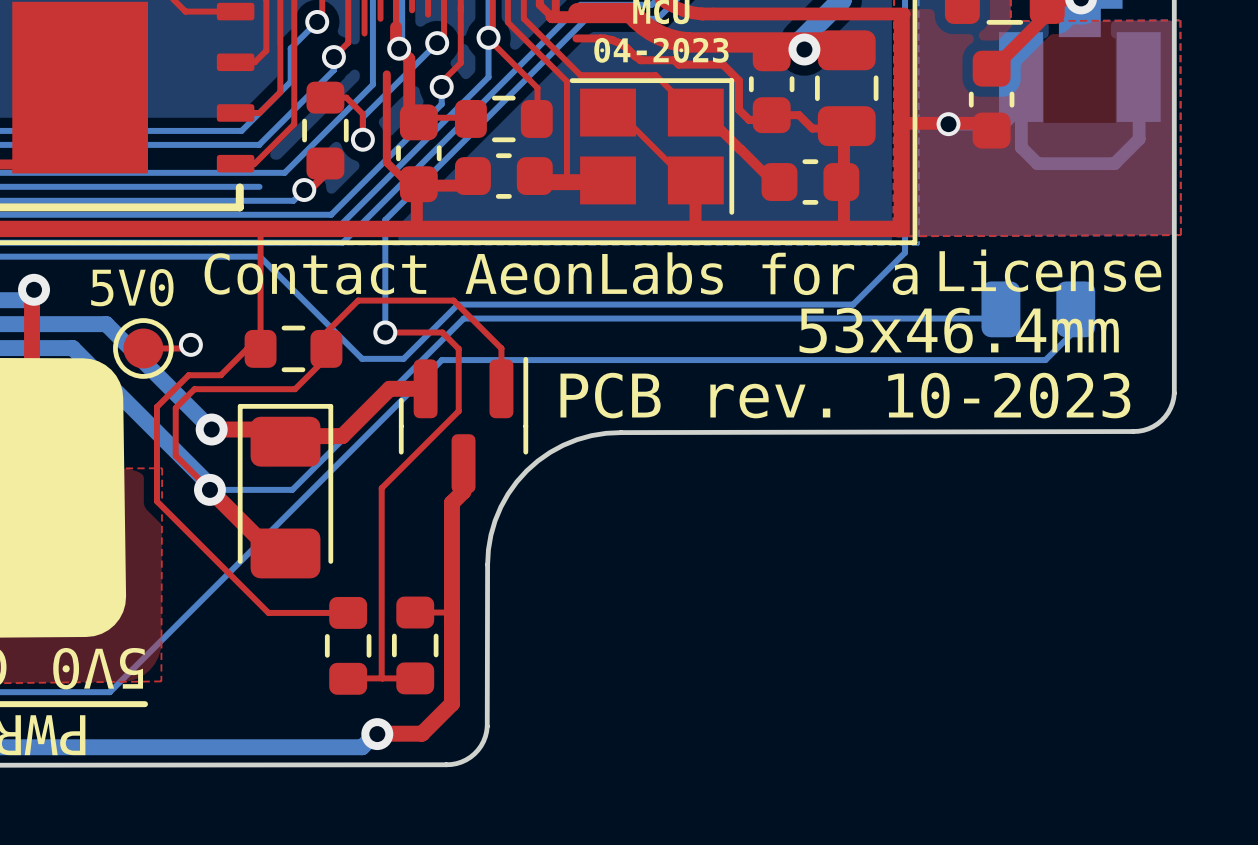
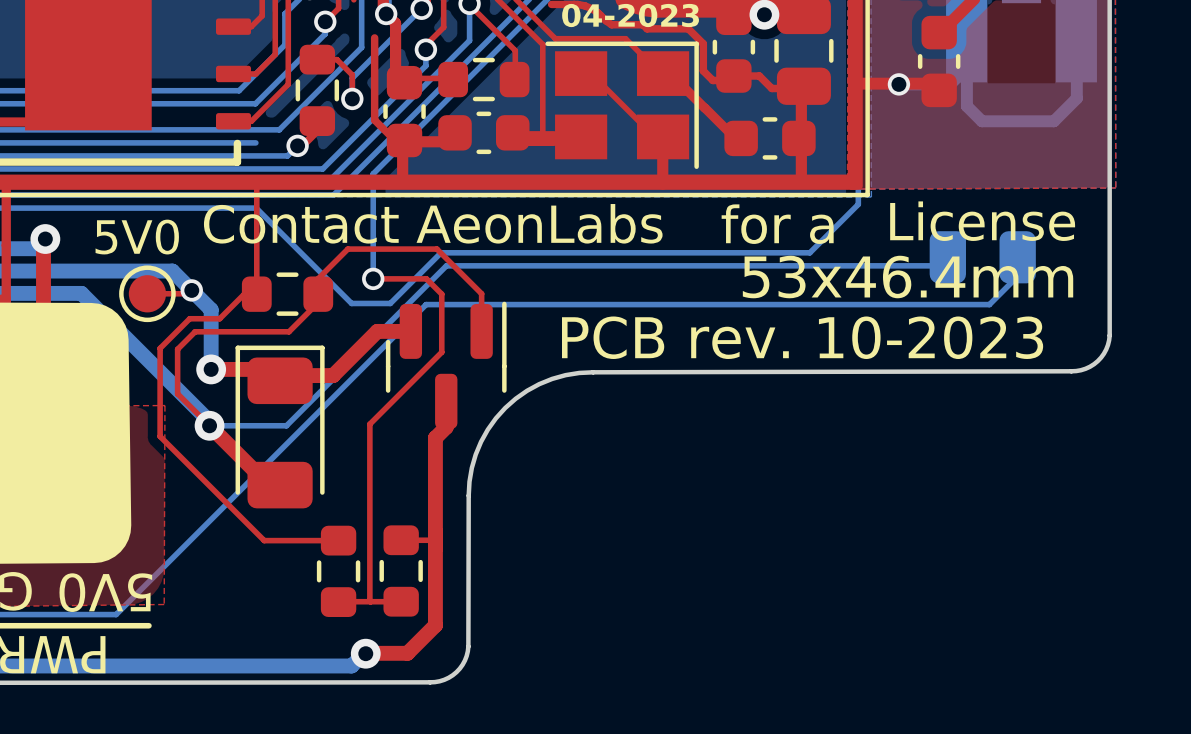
bottom track: (106, 324) (211, 429) -> (112, 271) (172, 271) (211, 309) (211, 369)

